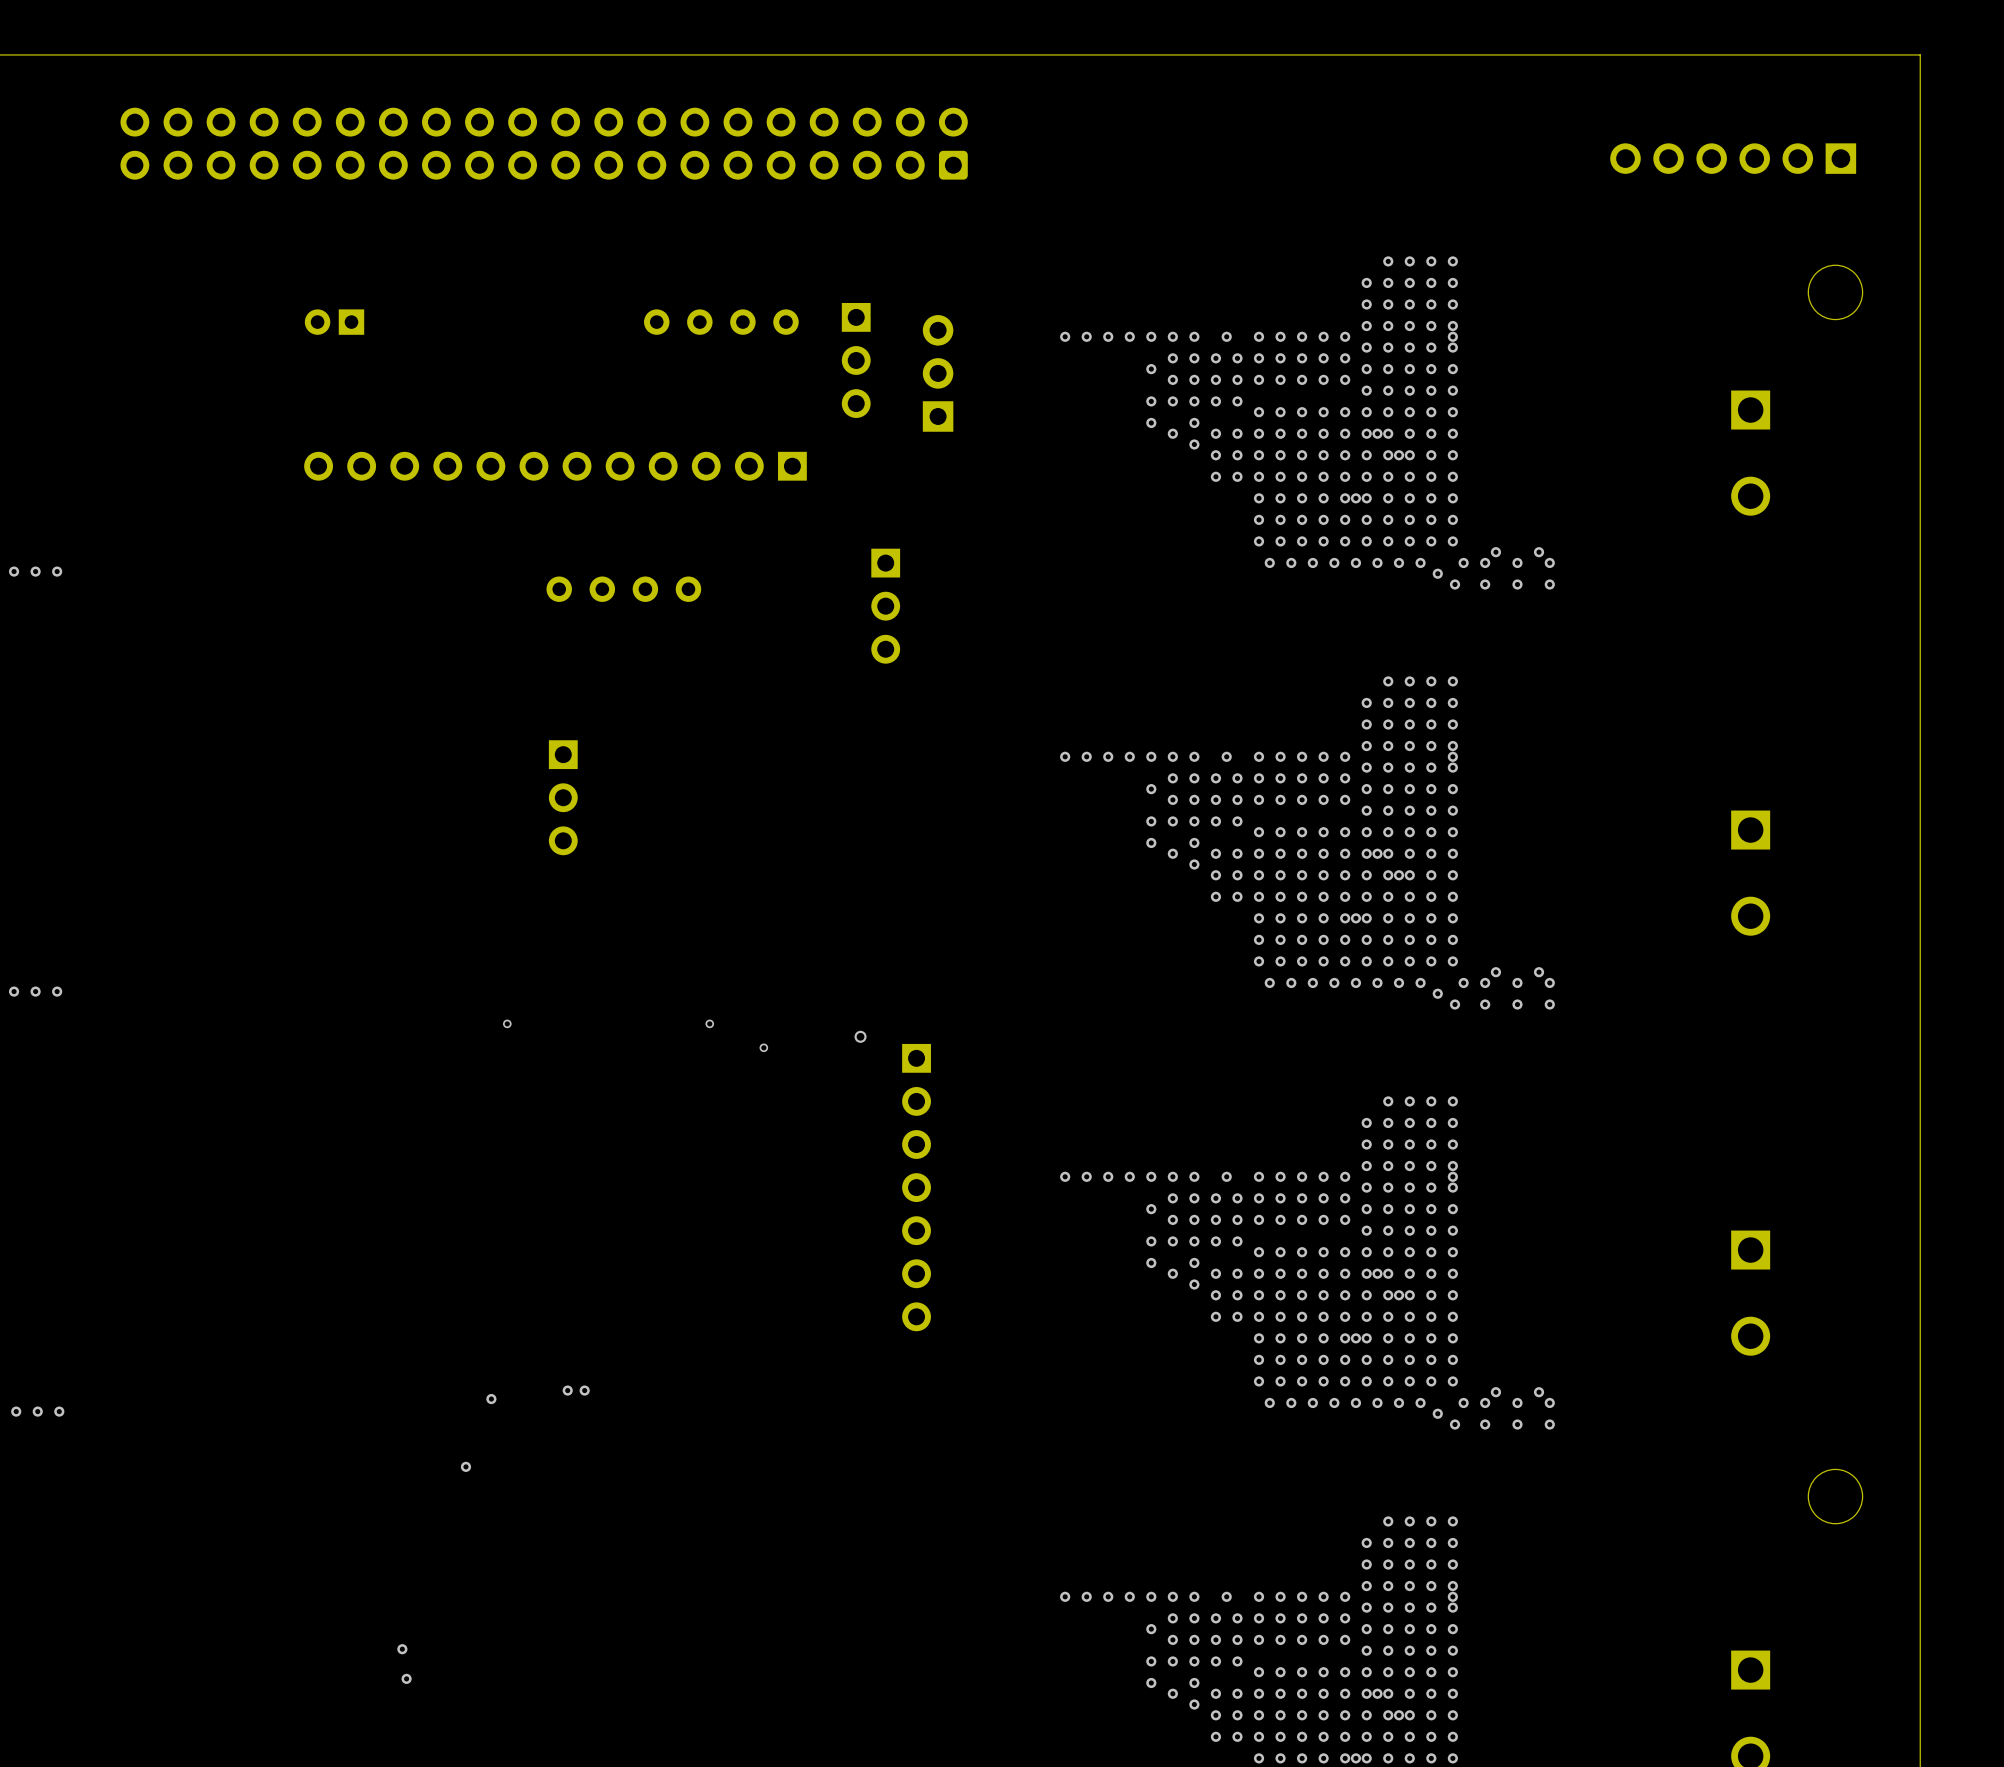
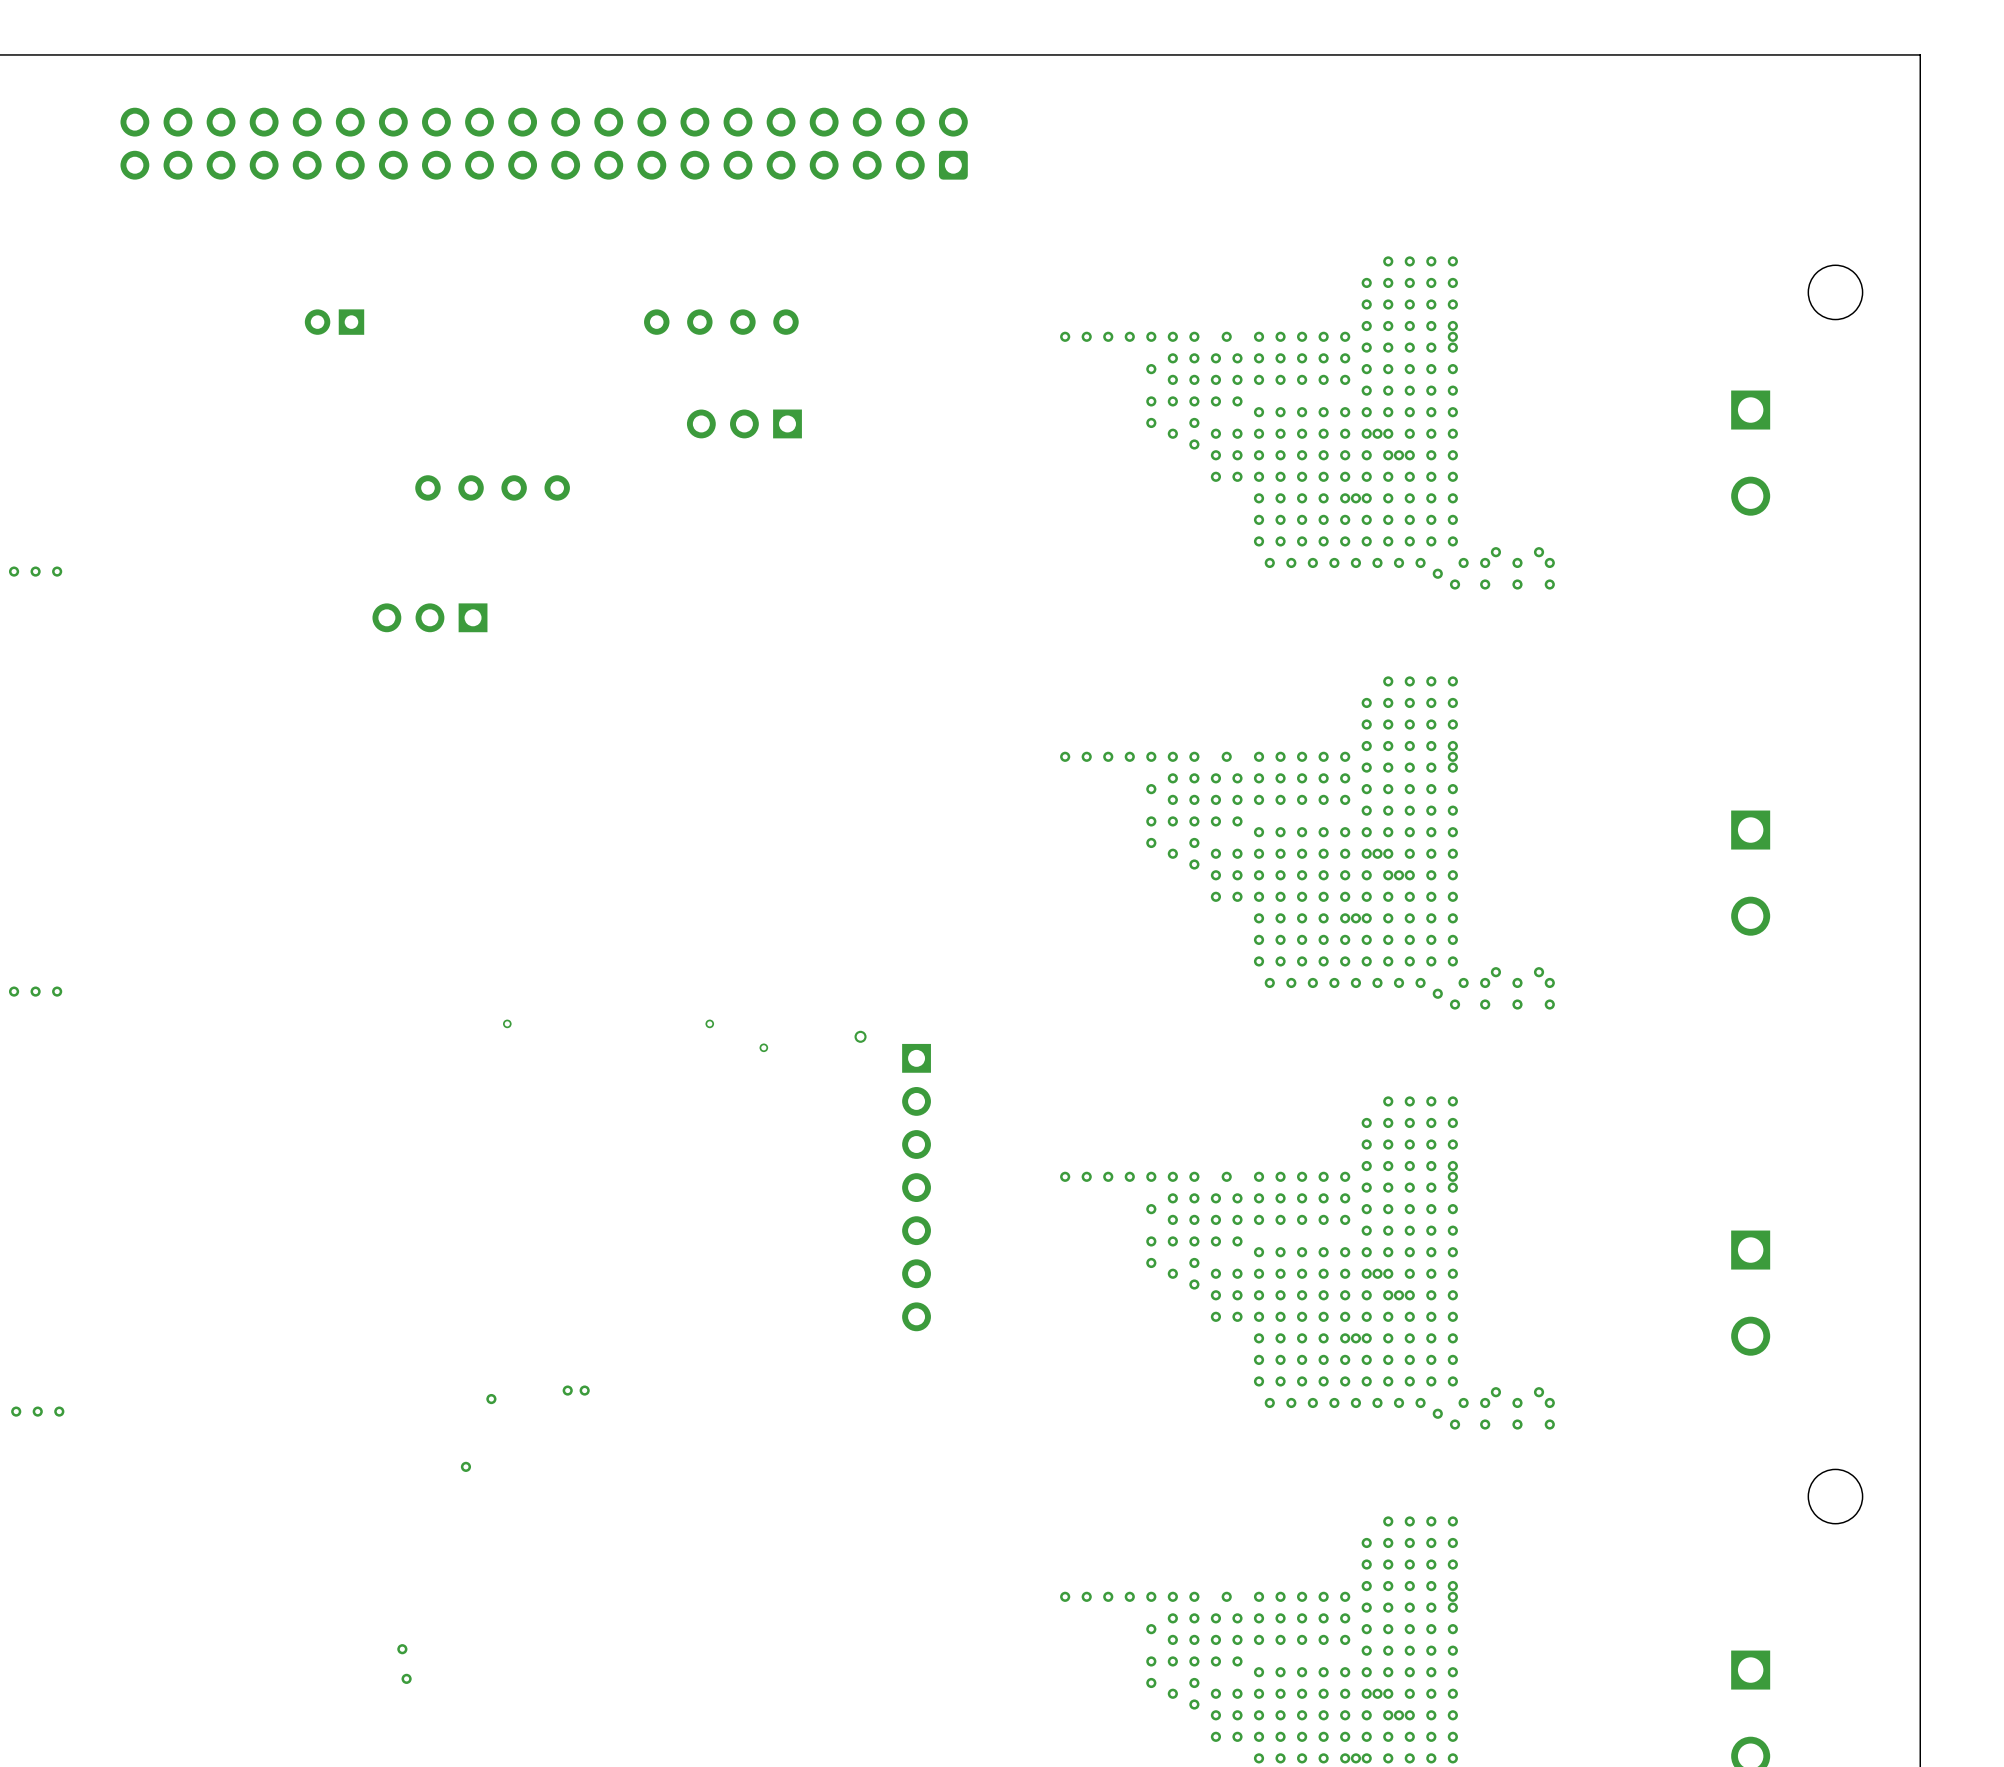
part: (1733, 158) -> none
part: (856, 360) -> none
part: (938, 373) -> none
part: none -> (744, 423)
part: (555, 466) -> none
part position: (623, 589) -> (492, 487)
part: (885, 606) -> none
part: none -> (429, 617)
part: (563, 797) -> none

